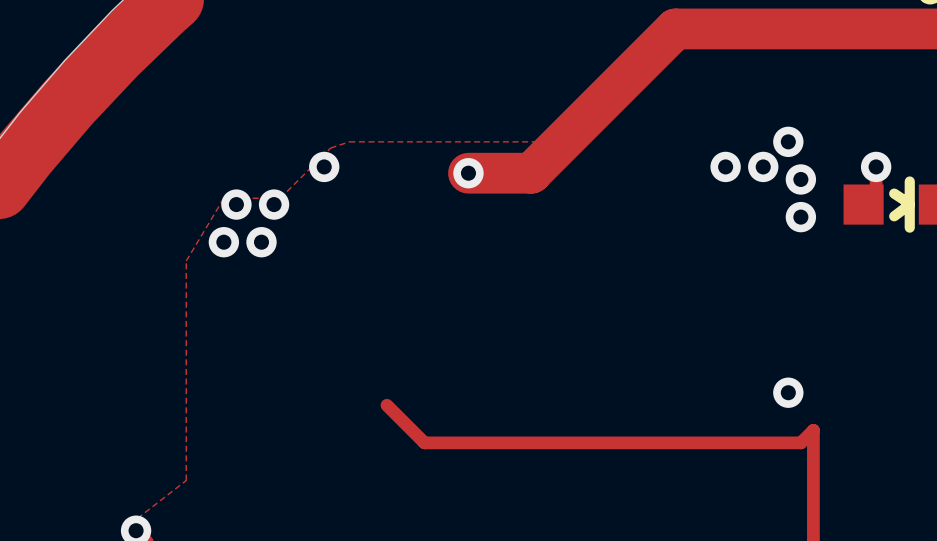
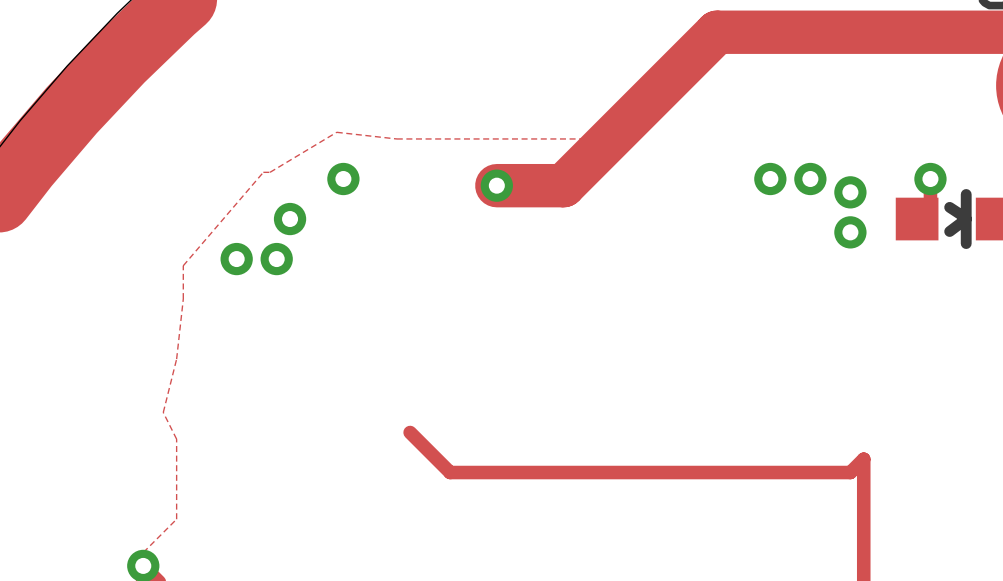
zone outline: (687, 41) (575, 141) (349, 141) (330, 148) (280, 198) (223, 198) (186, 261) (186, 480) (129, 524) -> (730, 45) (636, 138) (396, 138) (336, 132) (270, 172) (263, 172) (183, 265) (183, 299) (176, 359) (163, 412) (176, 439) (176, 519) (136, 559)
via: (788, 141) -> none
via: (236, 204) -> none
via: (788, 392) -> none

